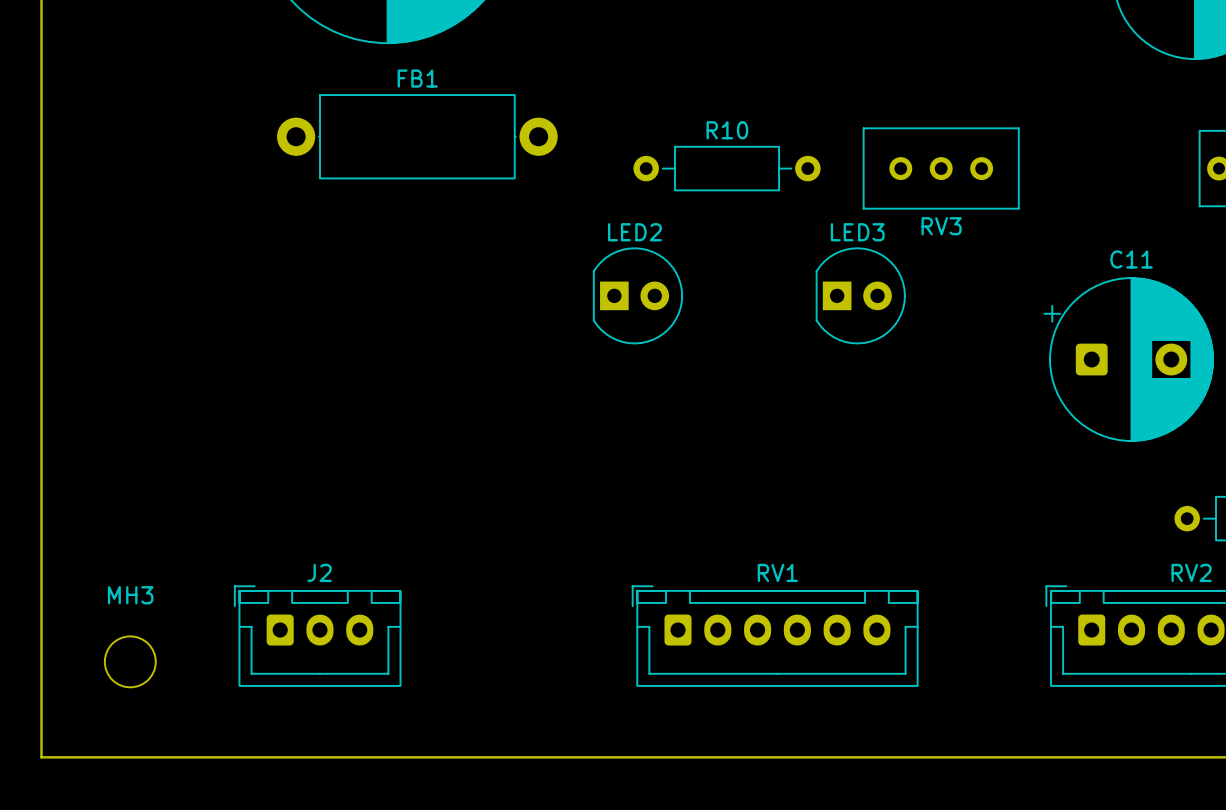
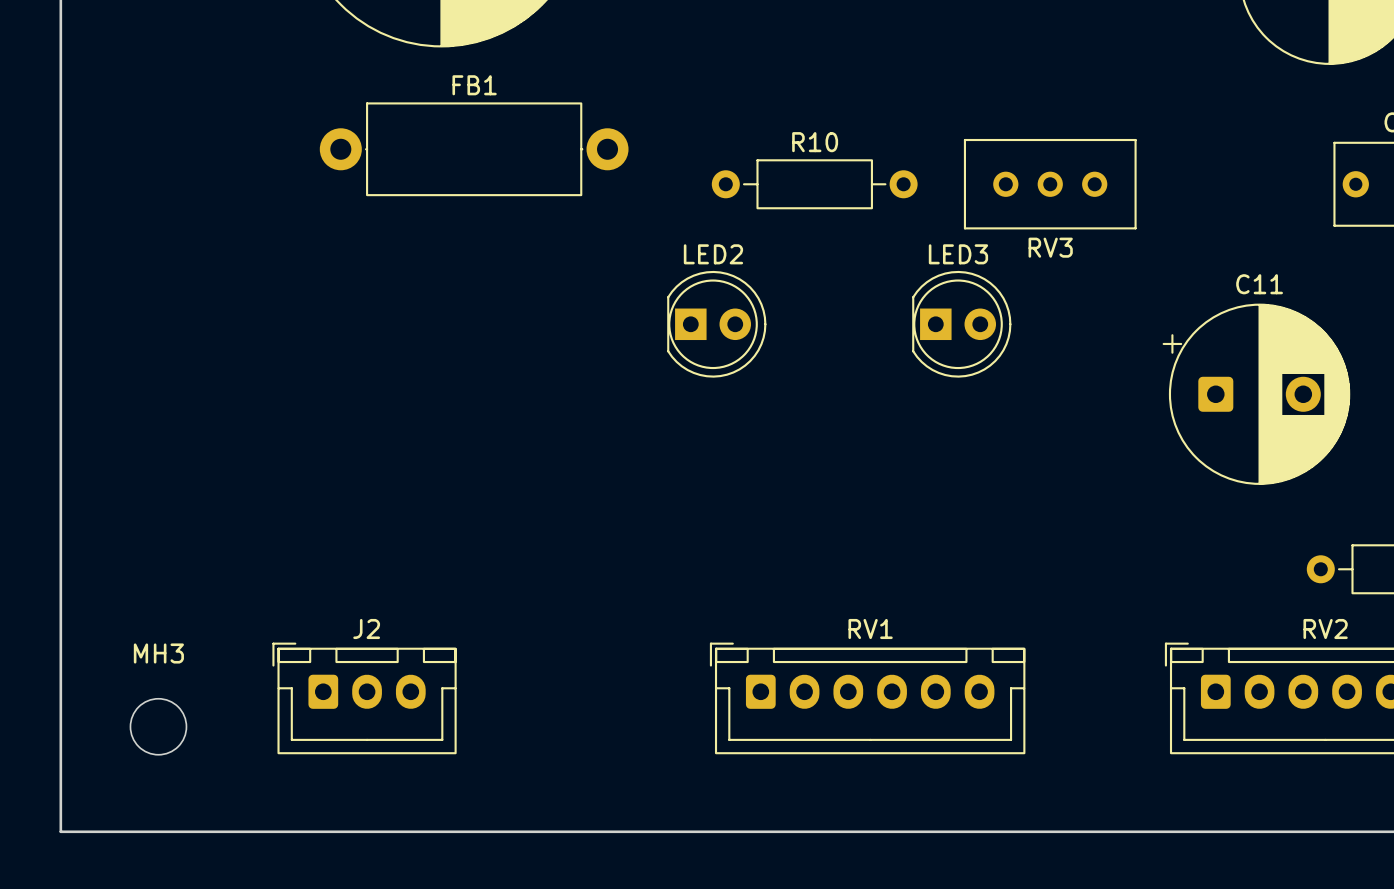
LED2 footprint: [592, 247, 684, 345] -> [667, 270, 767, 378]
LED3 footprint: [815, 247, 906, 345] -> [912, 270, 1012, 378]

